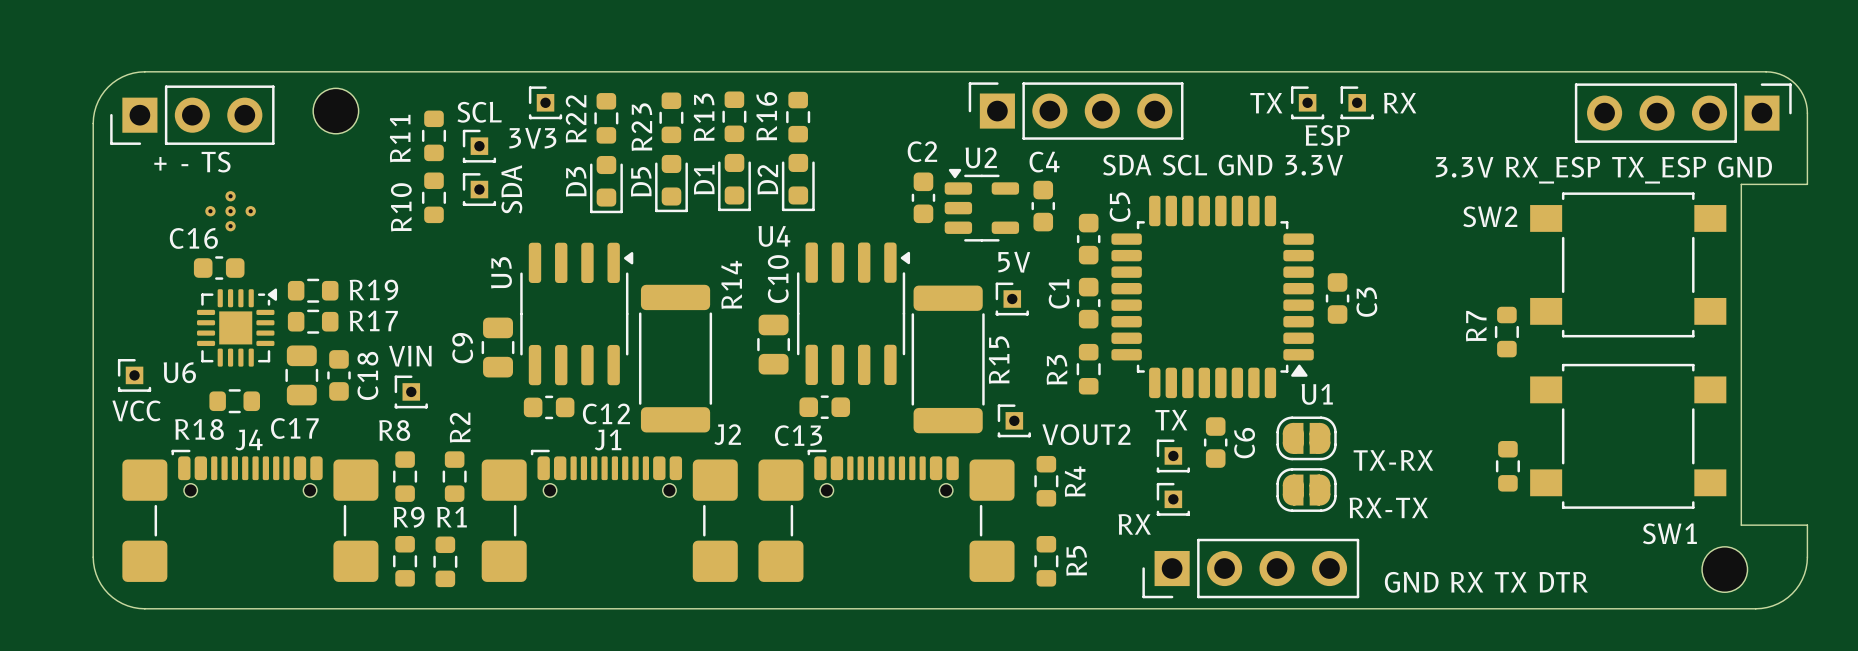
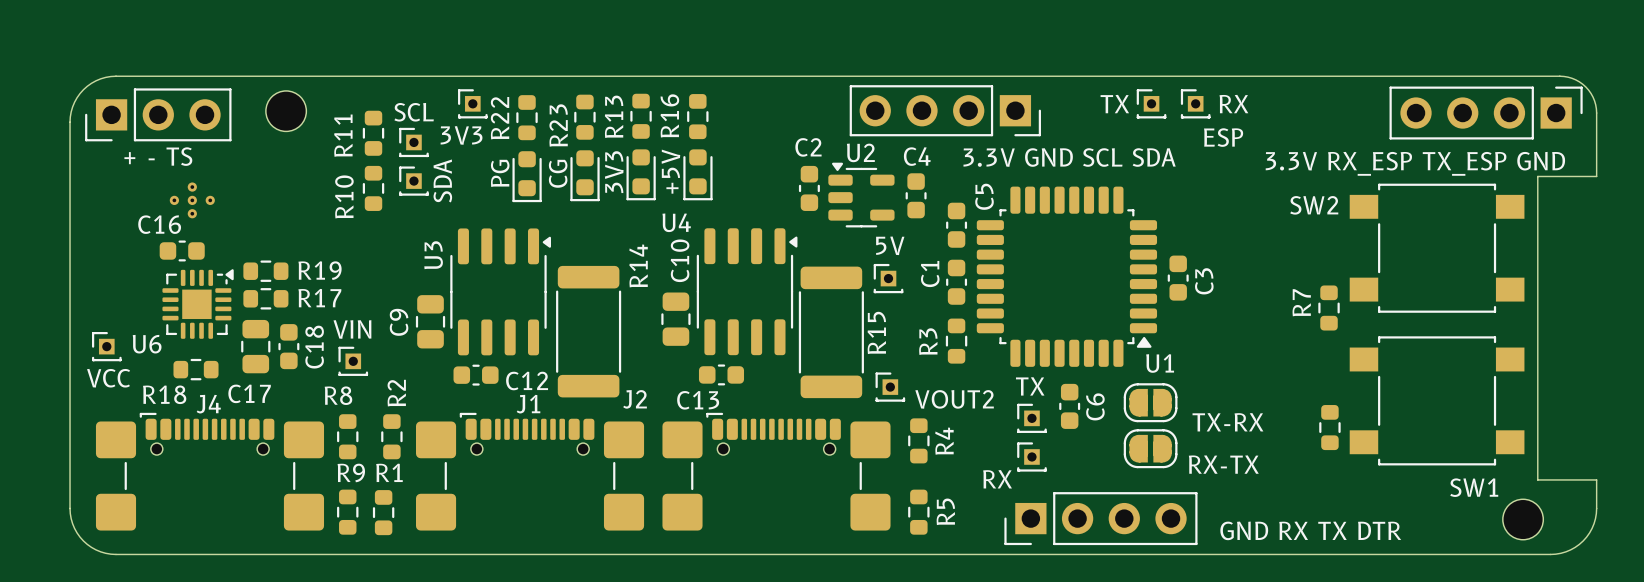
3.3V GND SCL SDA: none -> (945, 110)
SDA SCL GND 3.3V: (1076, 111) -> none
text position: ESP (1327, 135) -> ESP (1223, 137)
D1 name: D1 (704, 179) -> 3V3 (614, 172)
D2 name: D2 (767, 179) -> +5V (670, 171)
D3 name: D3 (576, 181) -> PG (500, 173)
D5 name: D5 (641, 181) -> CG (558, 173)

